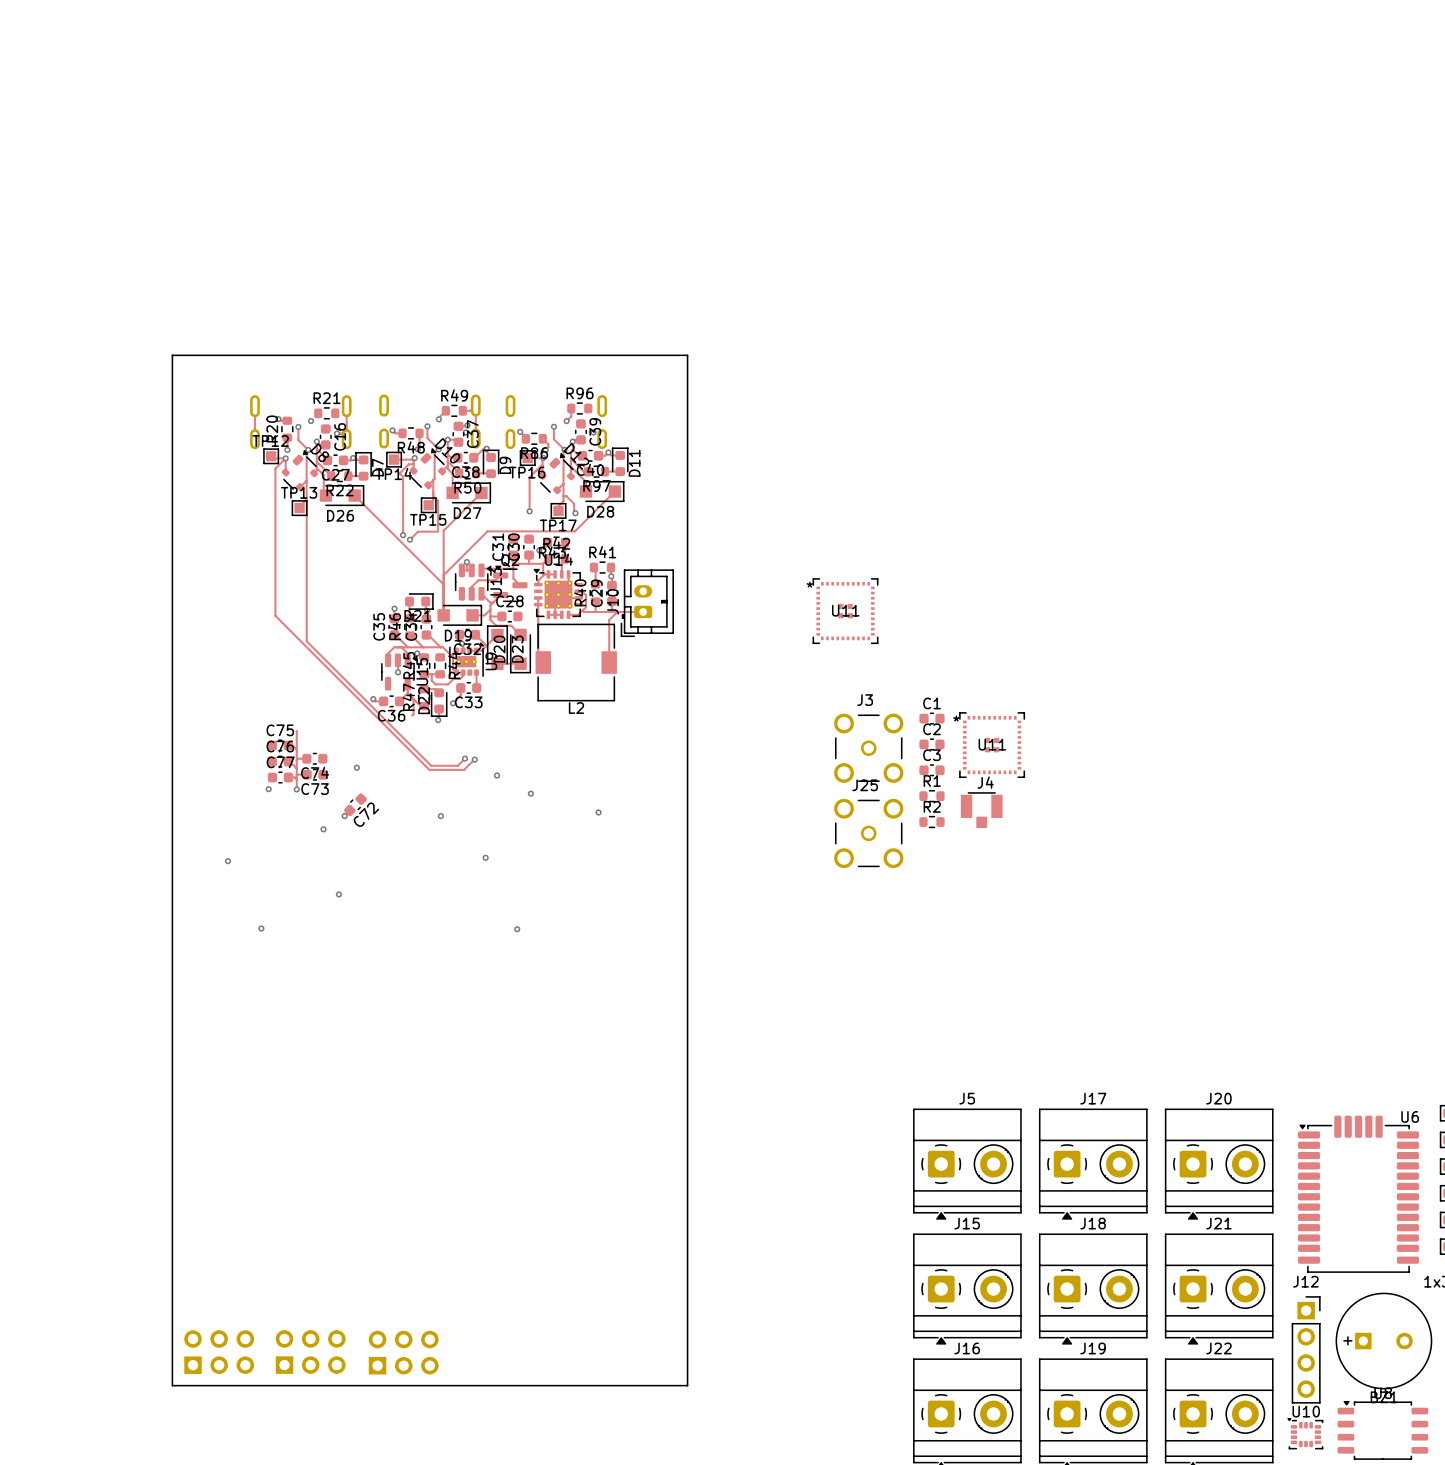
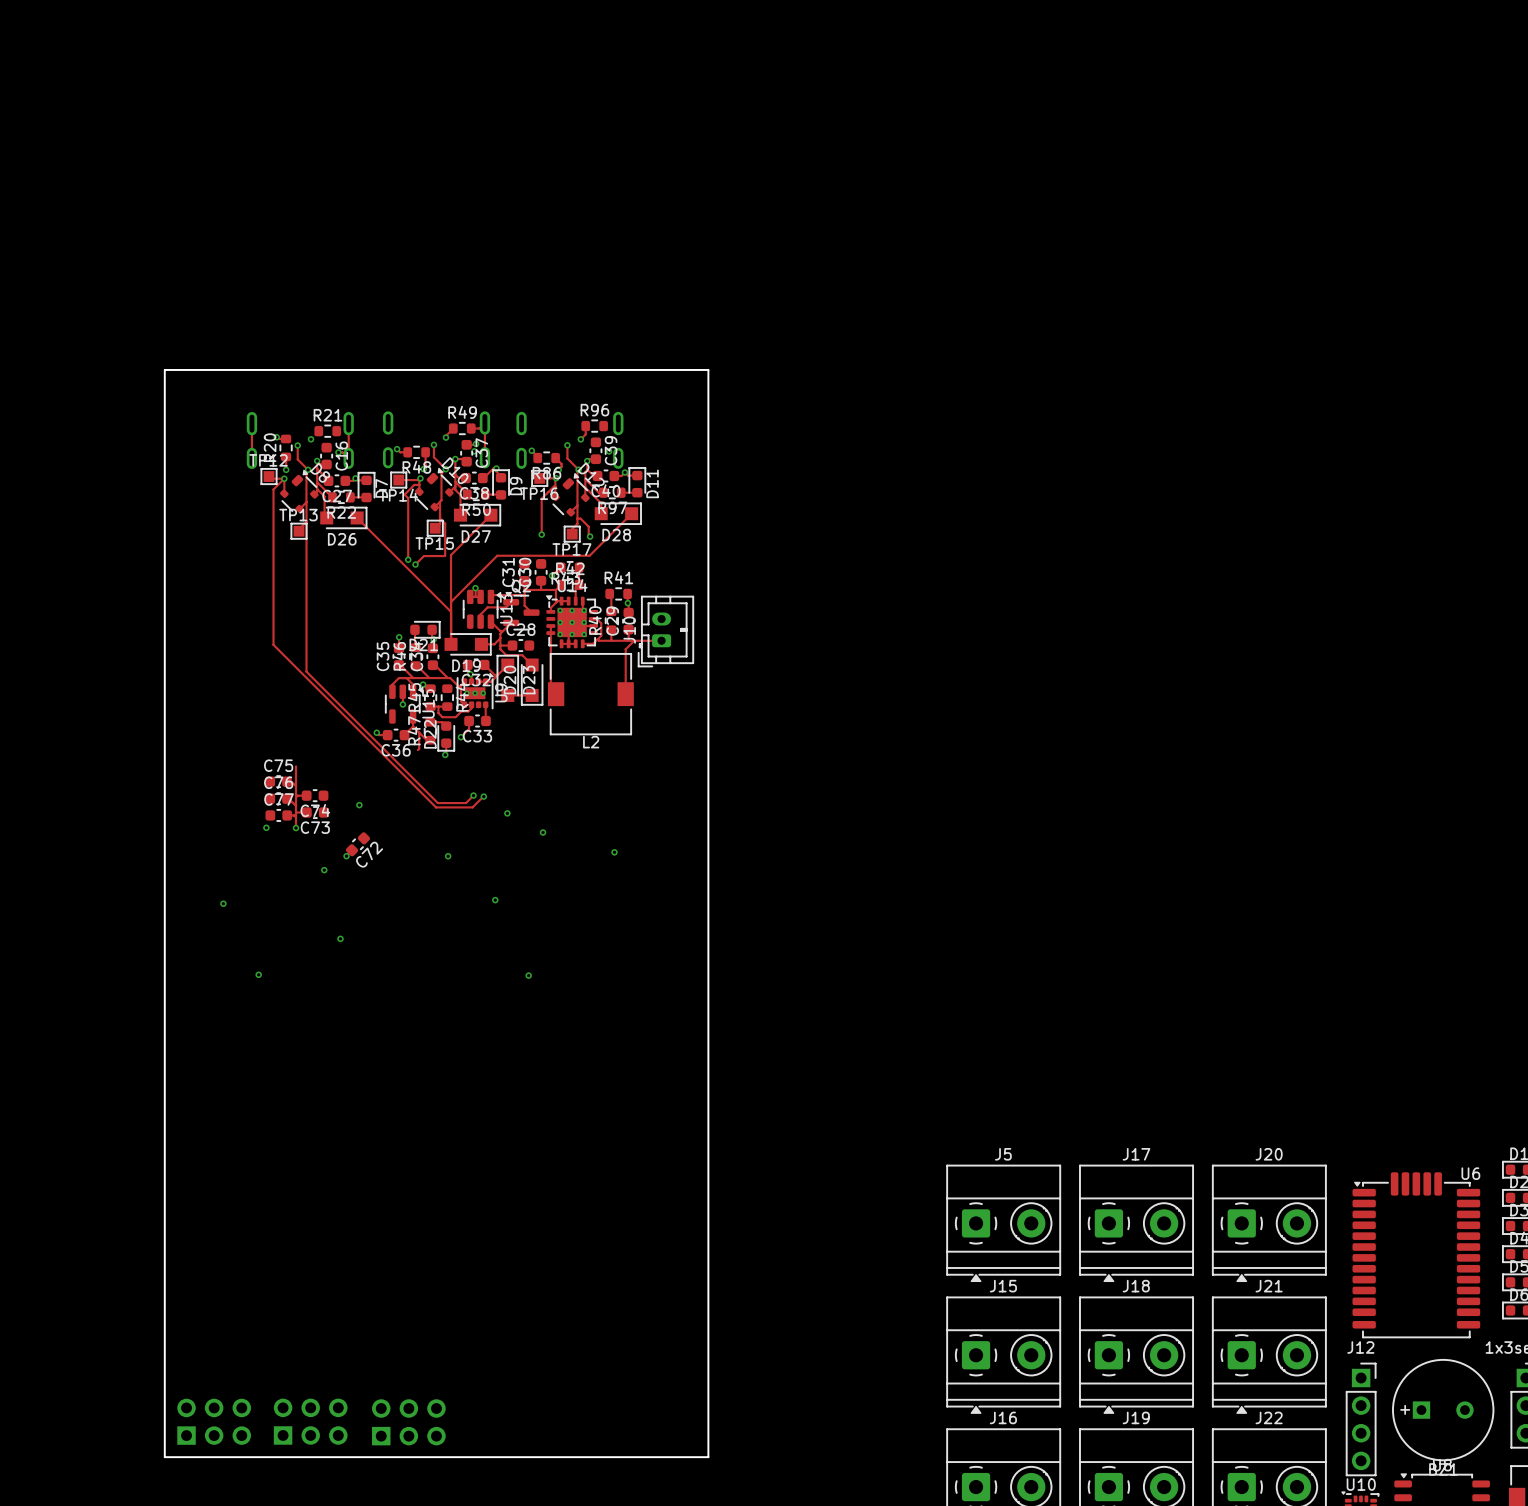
U11: (845, 611) -> none
C1: (932, 718) -> none
C2: (932, 744) -> none
U11: (992, 745) -> none
J3: (868, 748) -> none
C3: (932, 770) -> none
R1: (932, 796) -> none
J4: (981, 810) -> none
R2: (932, 822) -> none
J25: (868, 833) -> none

